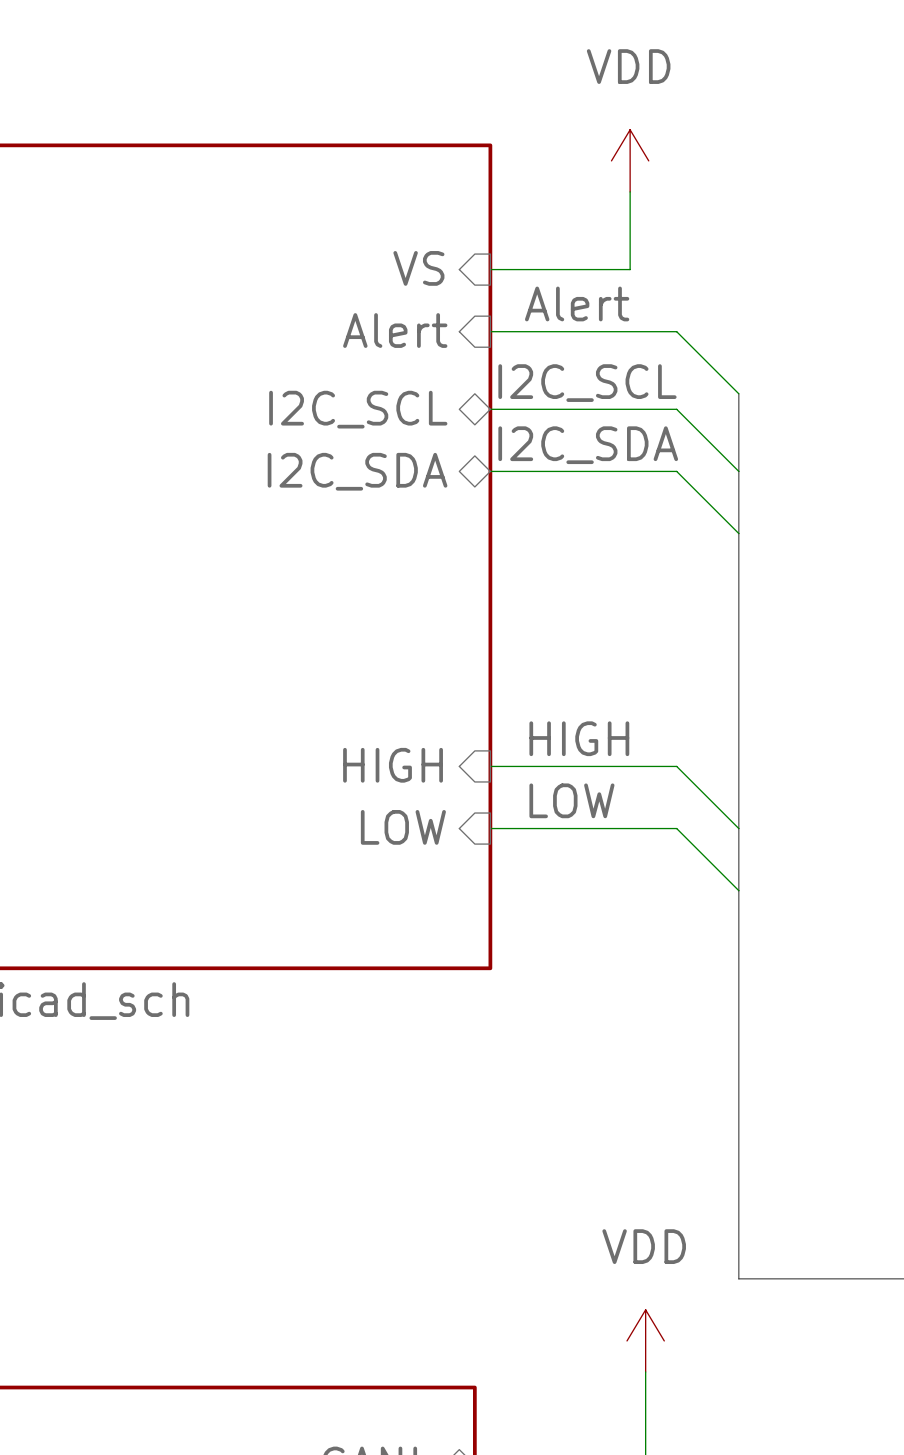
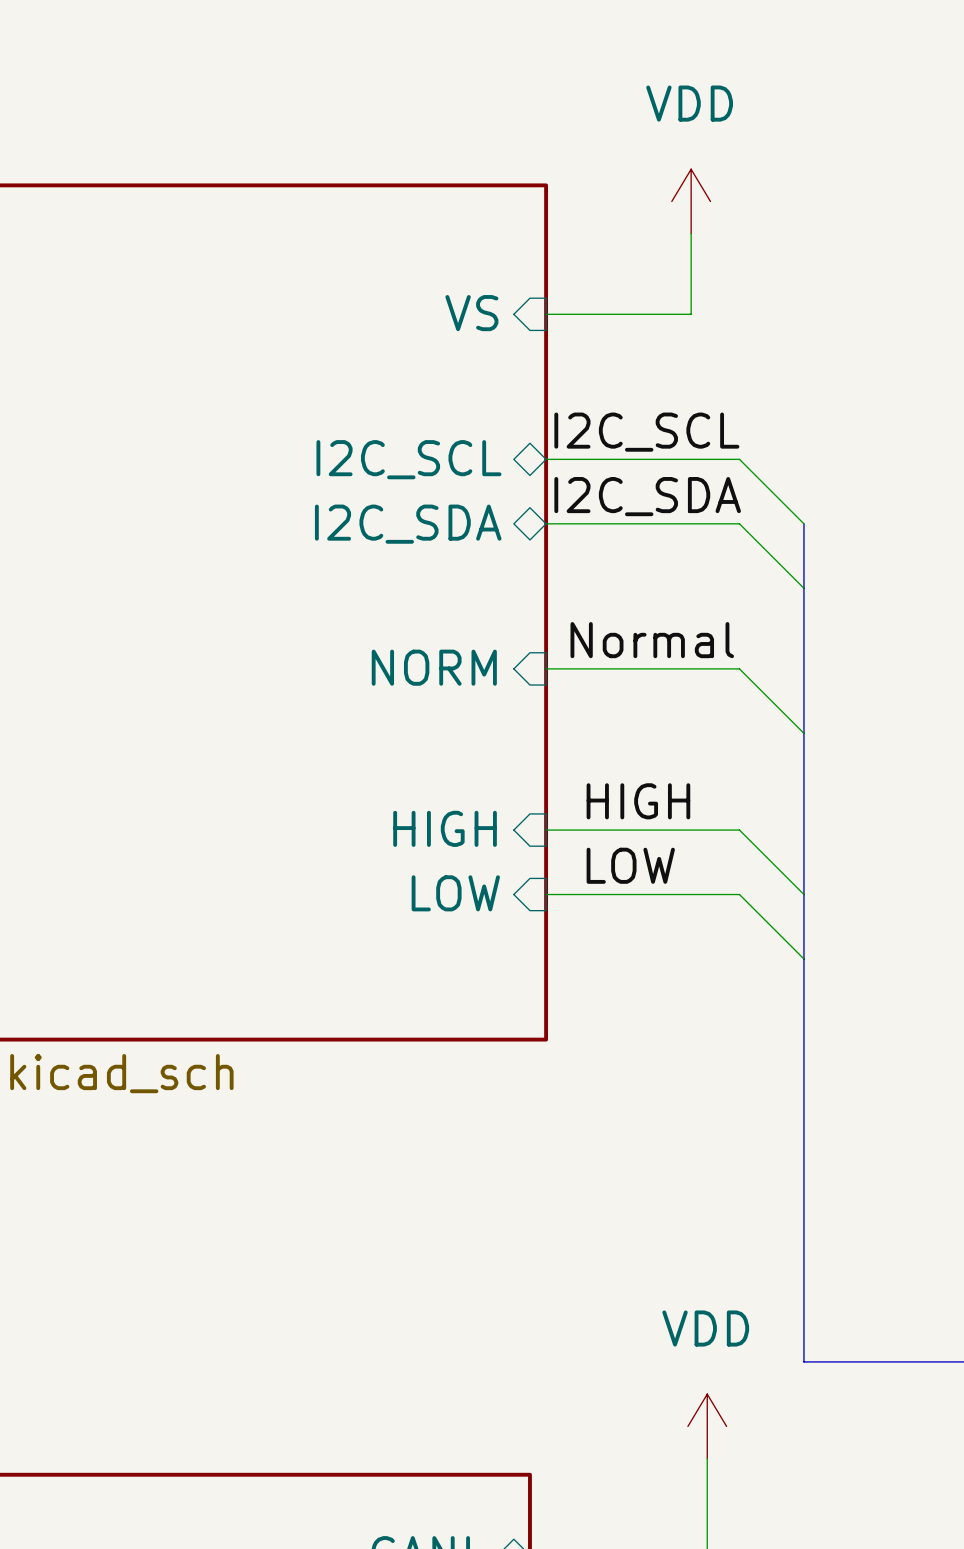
label: Alert (577, 303) -> none
sheet pin: Alert (395, 330) -> none
wire: (490, 331) (676, 331) (738, 393) -> (546, 668) (739, 668) (803, 733)
bus: (738, 393) (738, 471) -> none
label: none -> Normal (652, 640)
sheet pin: none -> NORM (434, 667)

